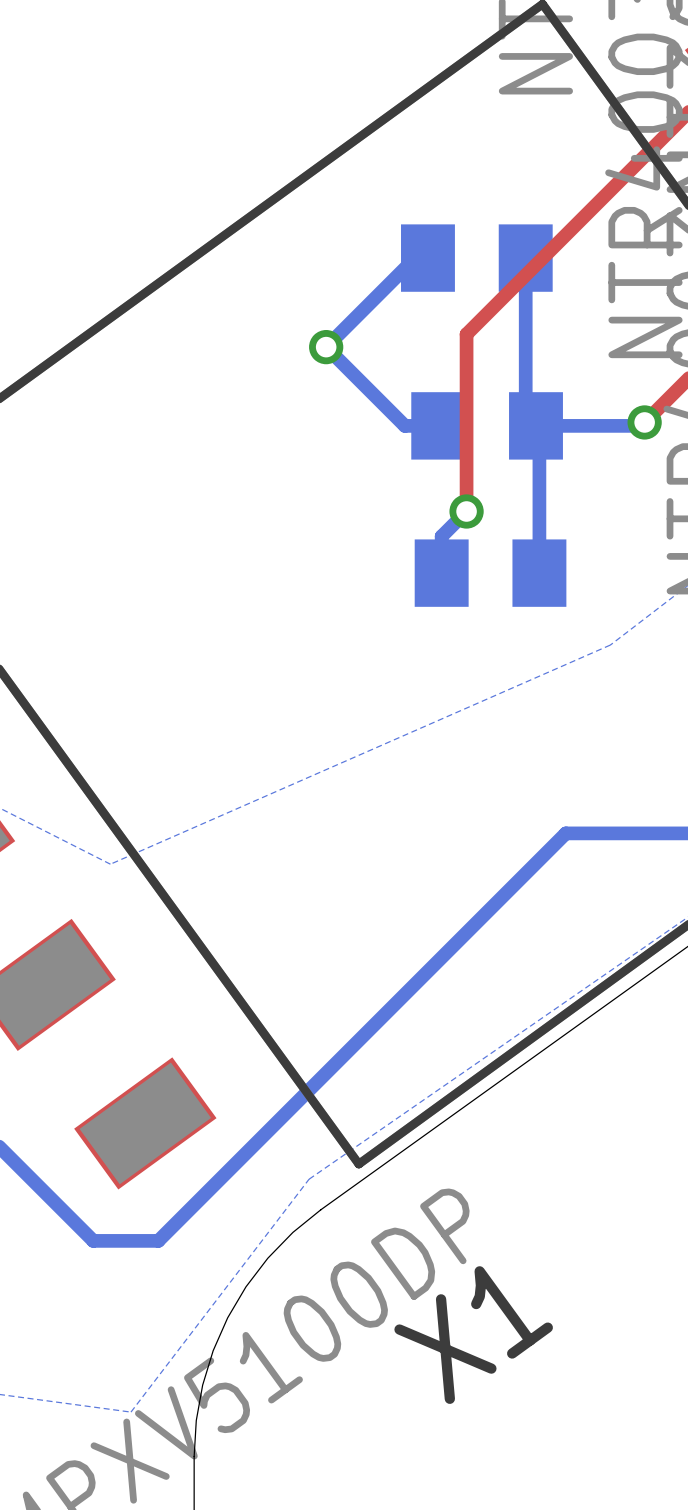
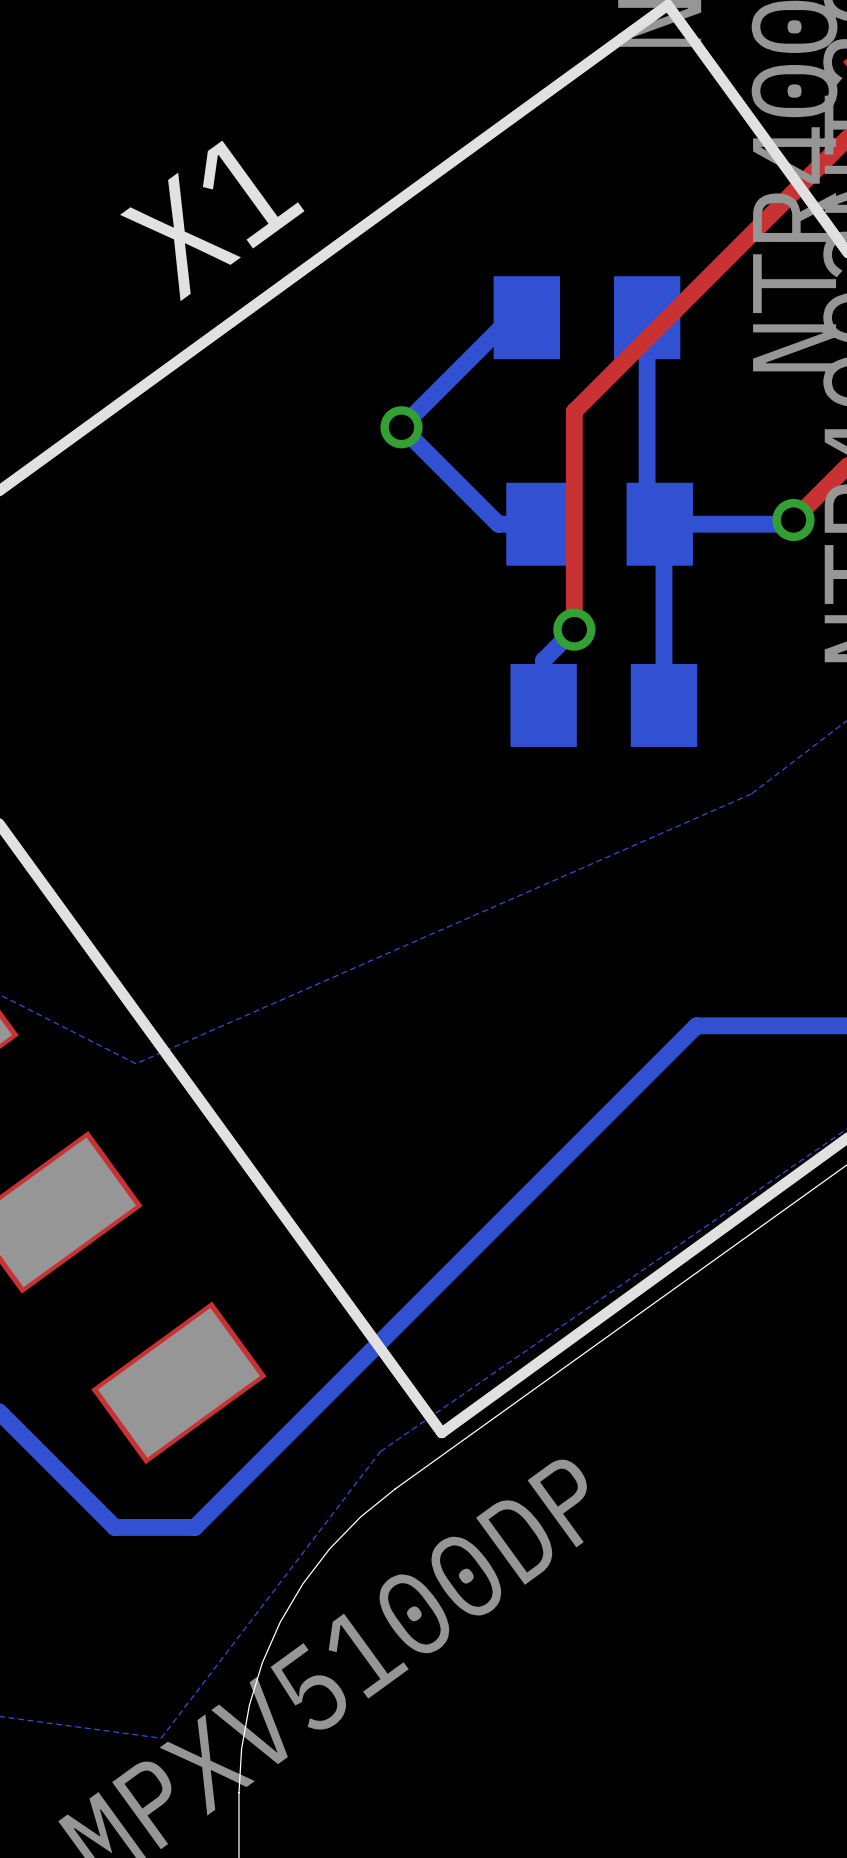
X1 name position: X1 (473, 1335) -> X1 (212, 220)

